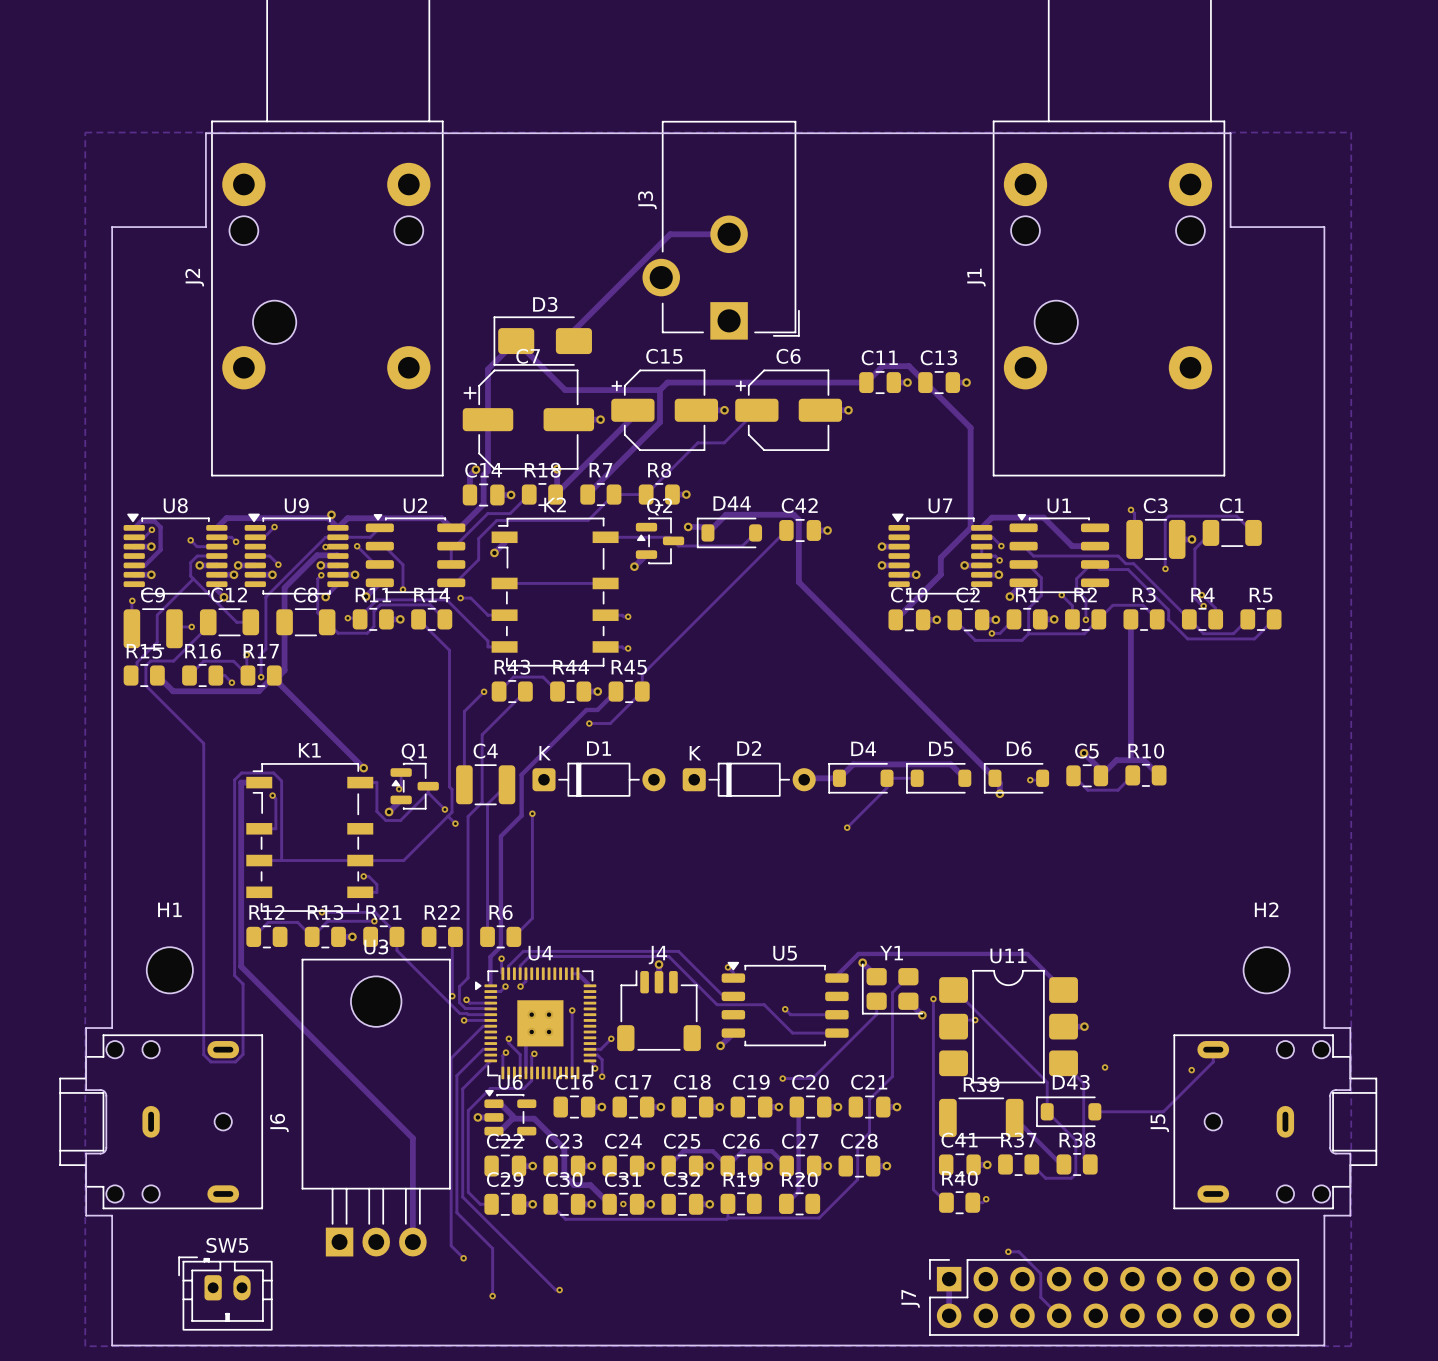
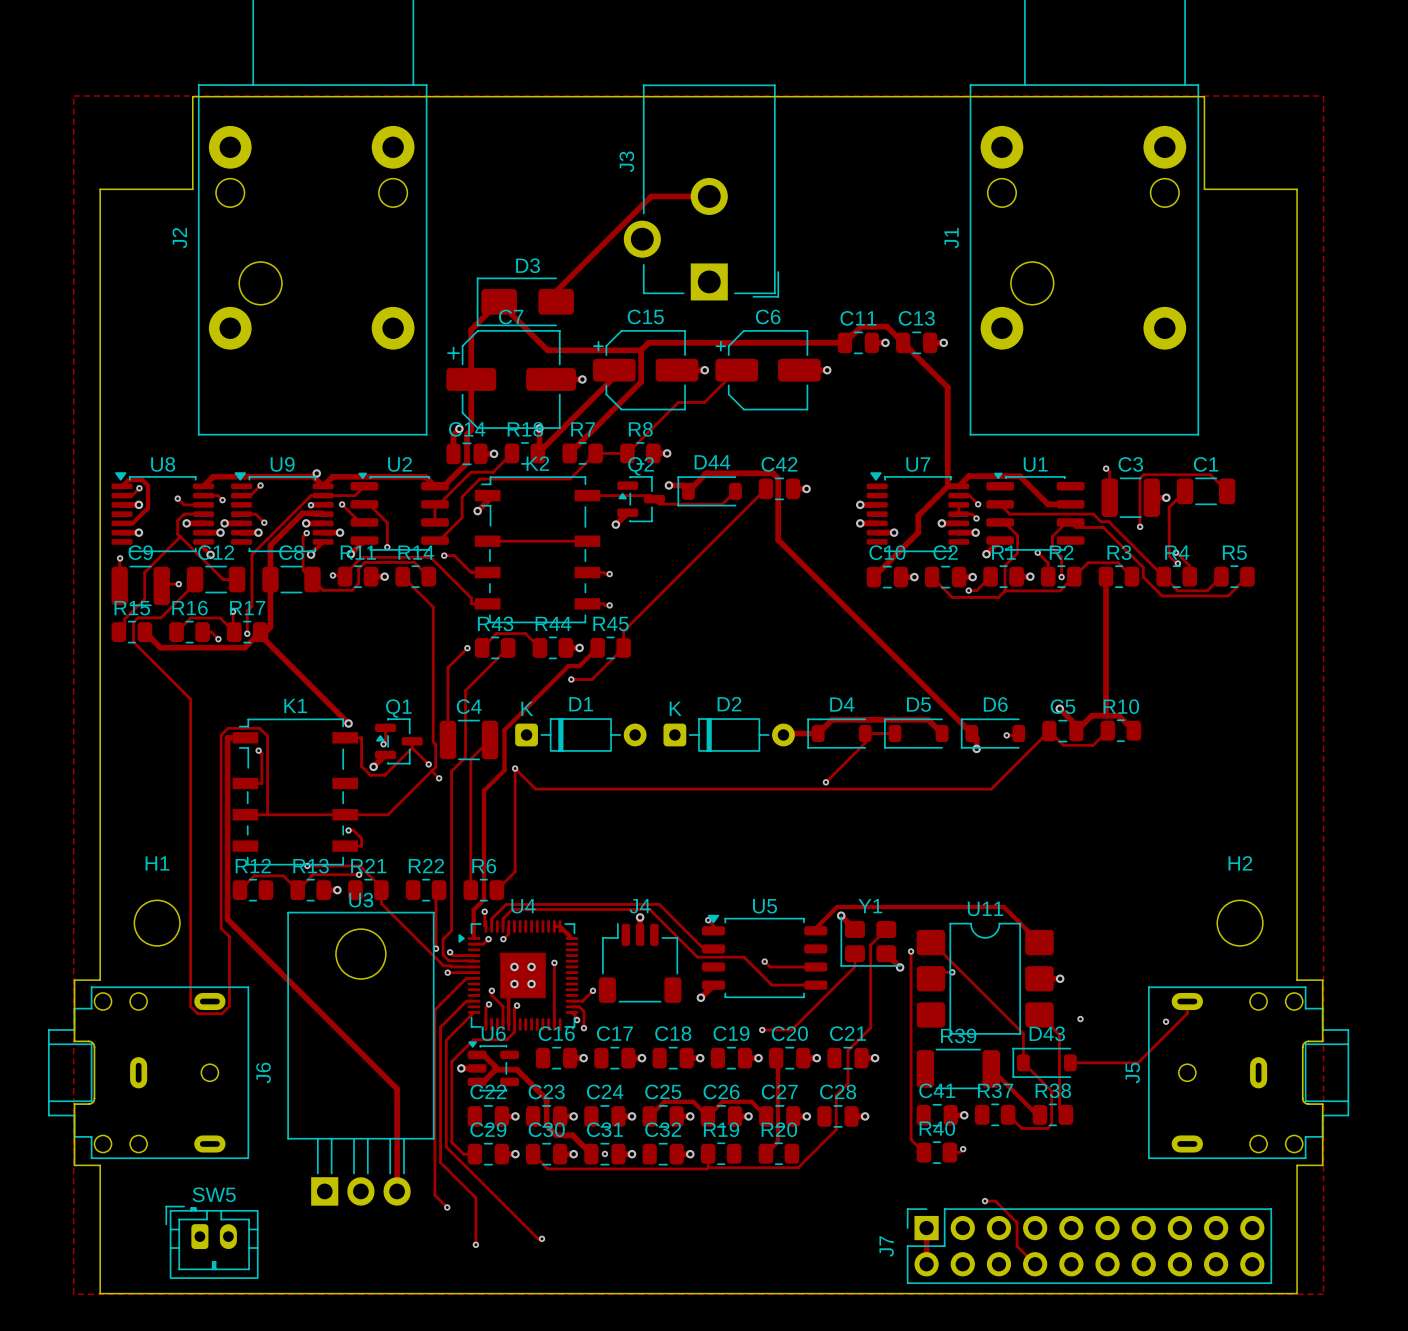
track: none -> (1049, 731) (991, 789) (535, 789) (515, 768)

